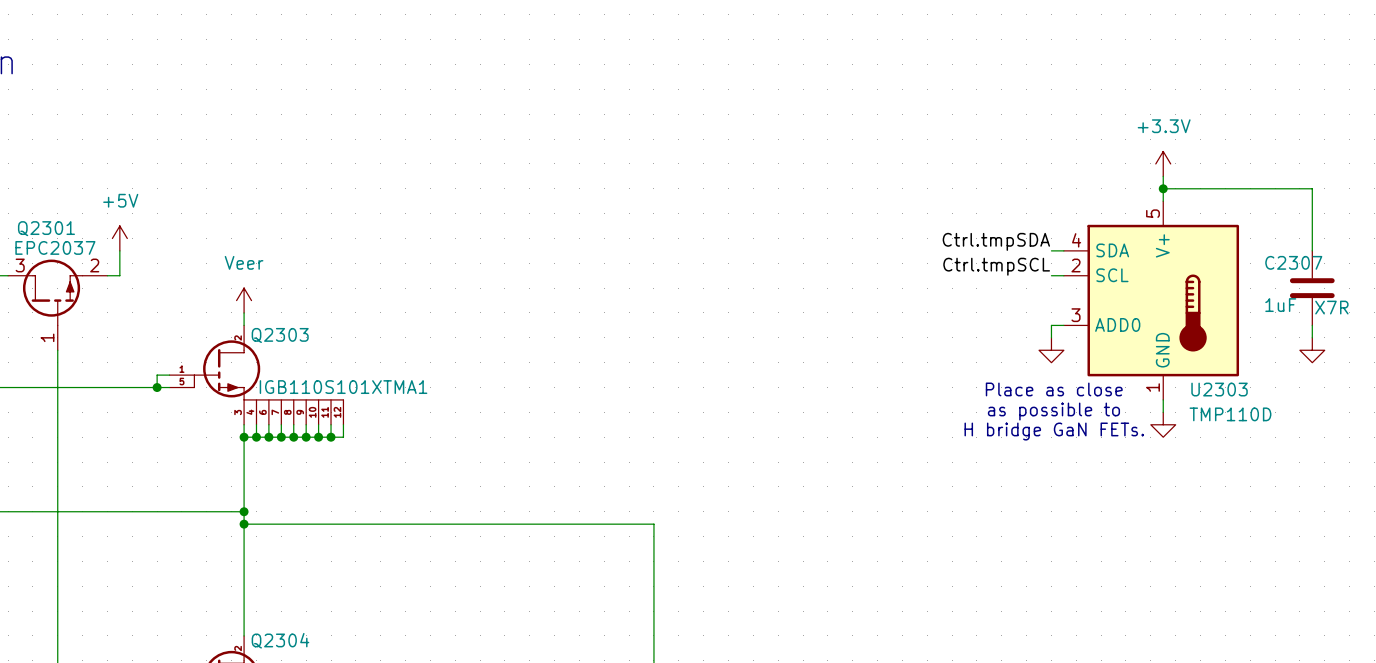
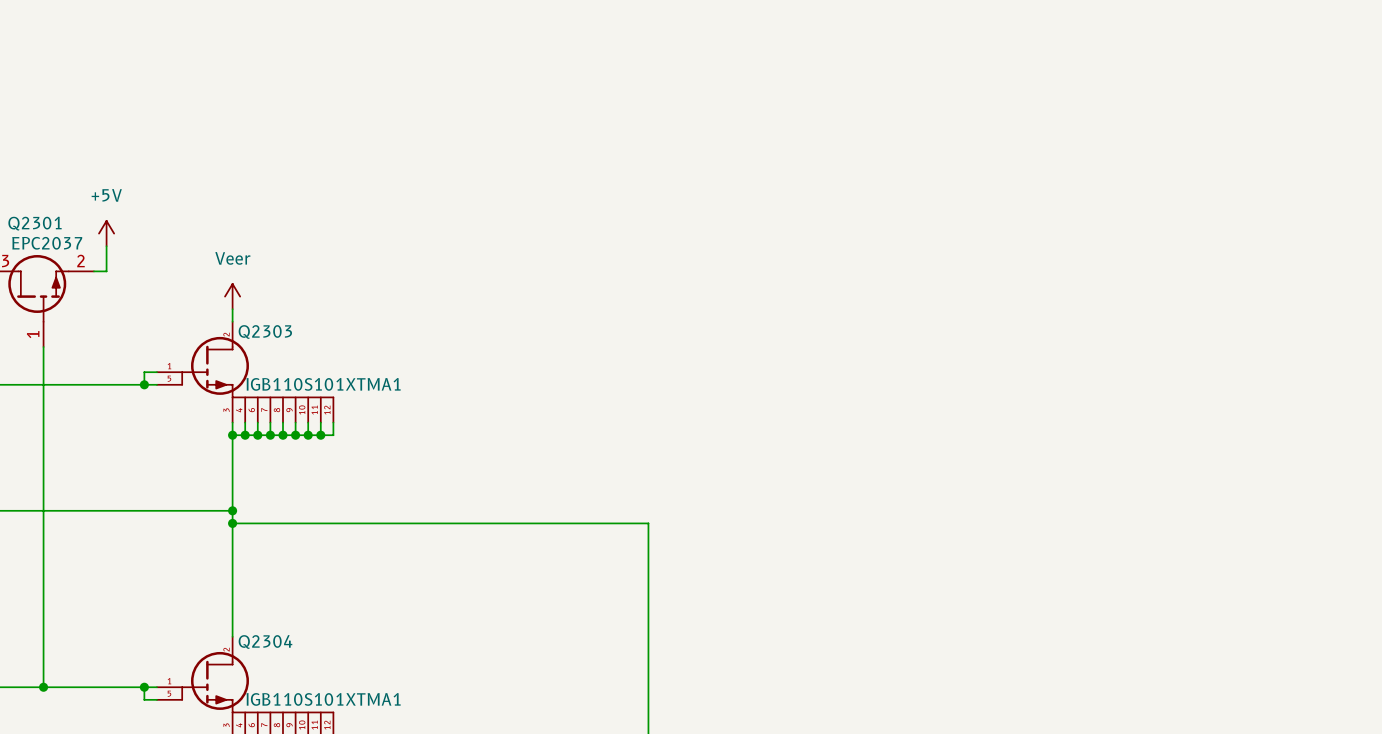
power symbol: +3.3V (1163, 163) -> none
wire: (1163, 176) (1163, 201) -> none
wire: (1163, 188) (1312, 188) (1312, 250) -> none
junction: (1163, 188) -> none
label: Ctrl.tmpSDA (996, 241) -> none
wire: (1051, 250) (1063, 250) -> none
label: Ctrl.tmpSCL (996, 266) -> none
wire: (1051, 275) (1063, 275) -> none
C2307: 1uF (1312, 288) -> none
U2303: TMP110D (1151, 300) -> none
wire: (1063, 325) (1051, 325) (1051, 337) -> none
wire: (1312, 325) (1312, 337) -> none
power symbol: (1051, 350) -> none
power symbol: (1312, 350) -> none
text: Place as close (1054, 389) -> none
wire: (1163, 399) (1163, 412) -> none
text: as possible to (1053, 411) -> none
power symbol: (1163, 424) -> none
text: H bridge GaN FETs. (1054, 431) -> none

